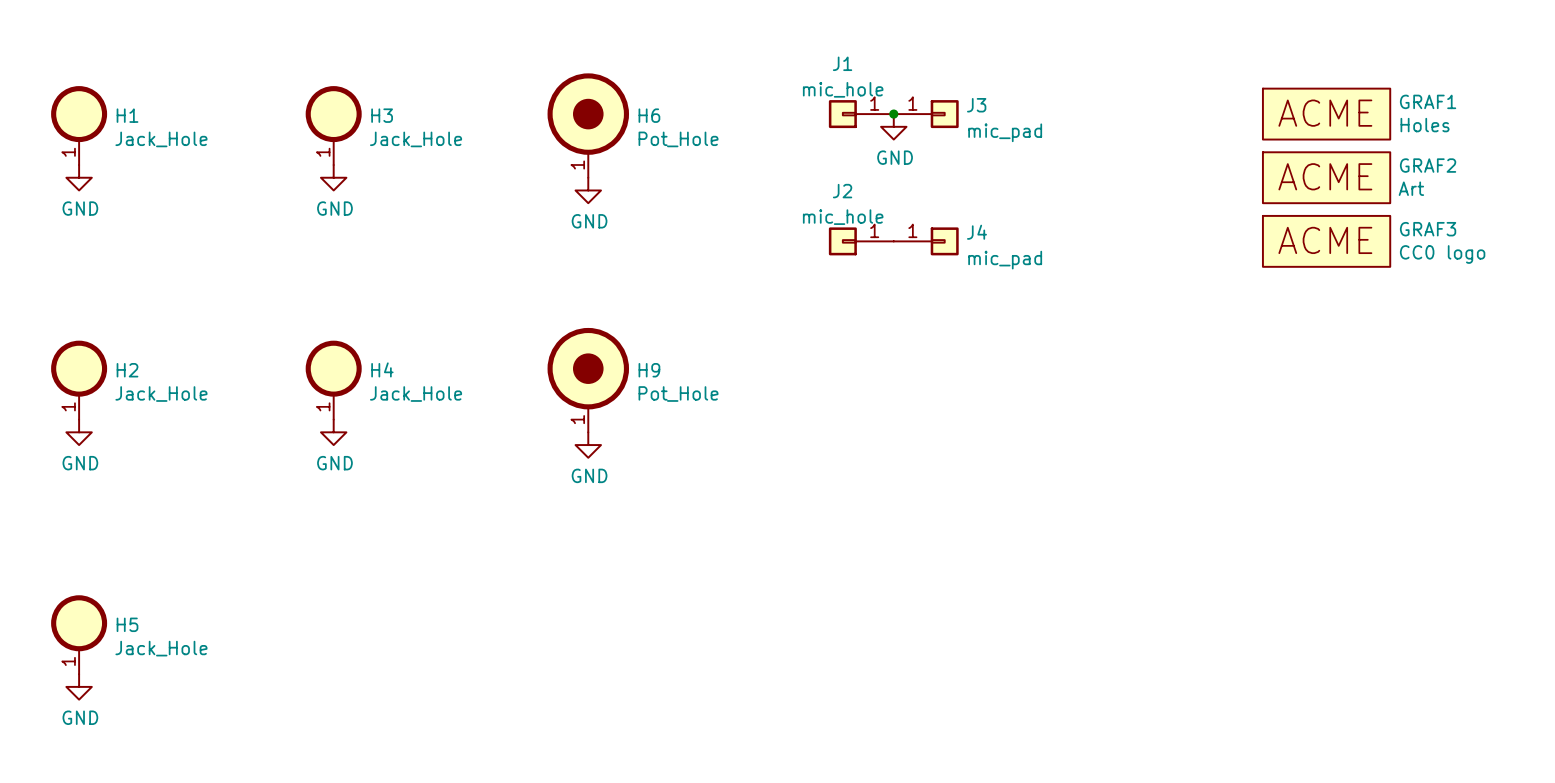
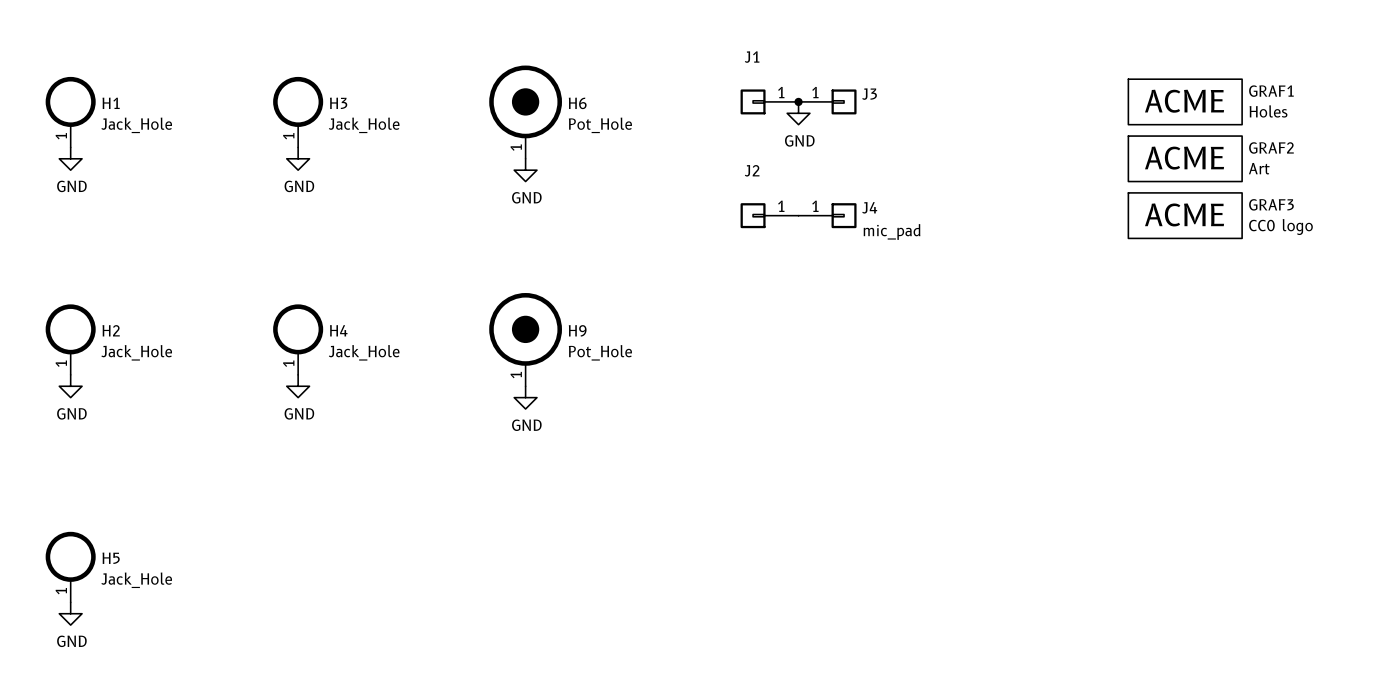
J1 value: mic_hole (843, 89) -> none
J3 value: mic_pad (1005, 132) -> none
J2 value: mic_hole (843, 217) -> none

